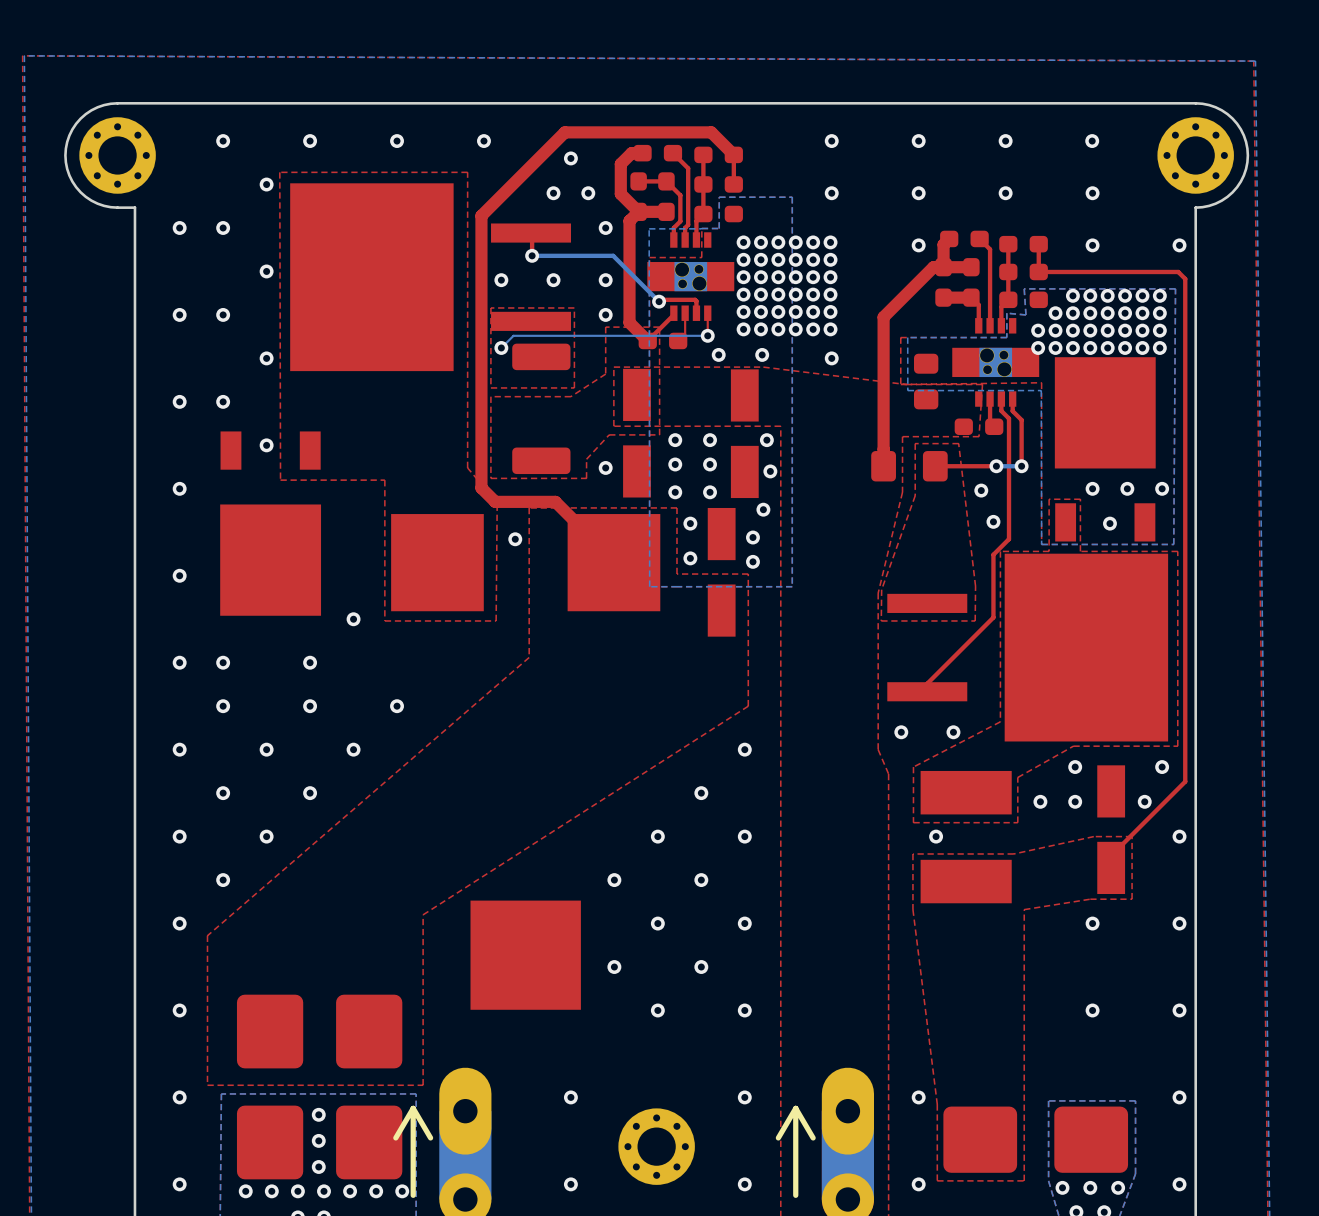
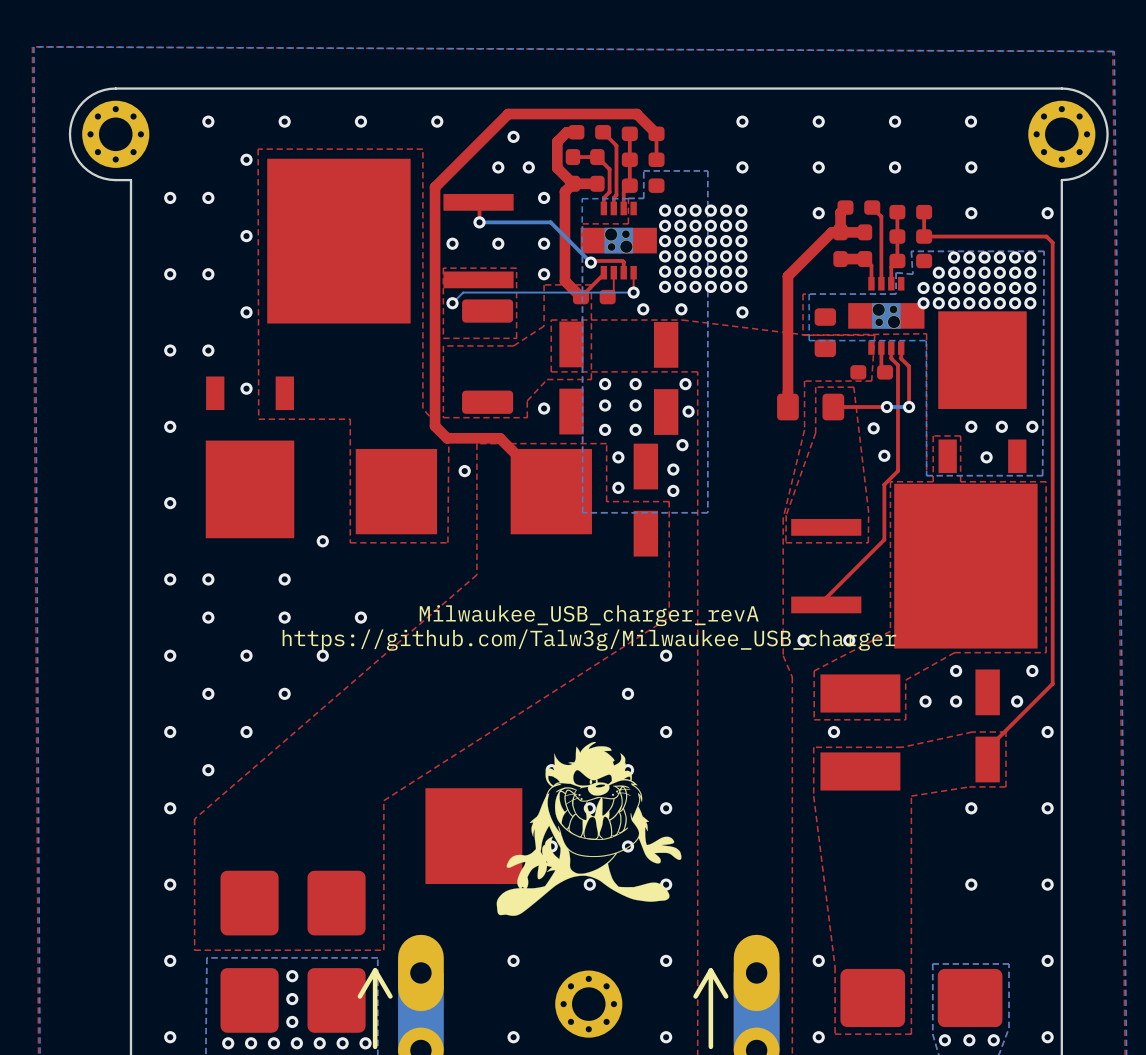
text: none -> Milwaukee_USB_charger_revA (589, 615)
text: none -> https://github.com/Talw3g/Milwaukee_USB_charger (589, 640)
drawing: none -> [496, 741, 682, 916]

